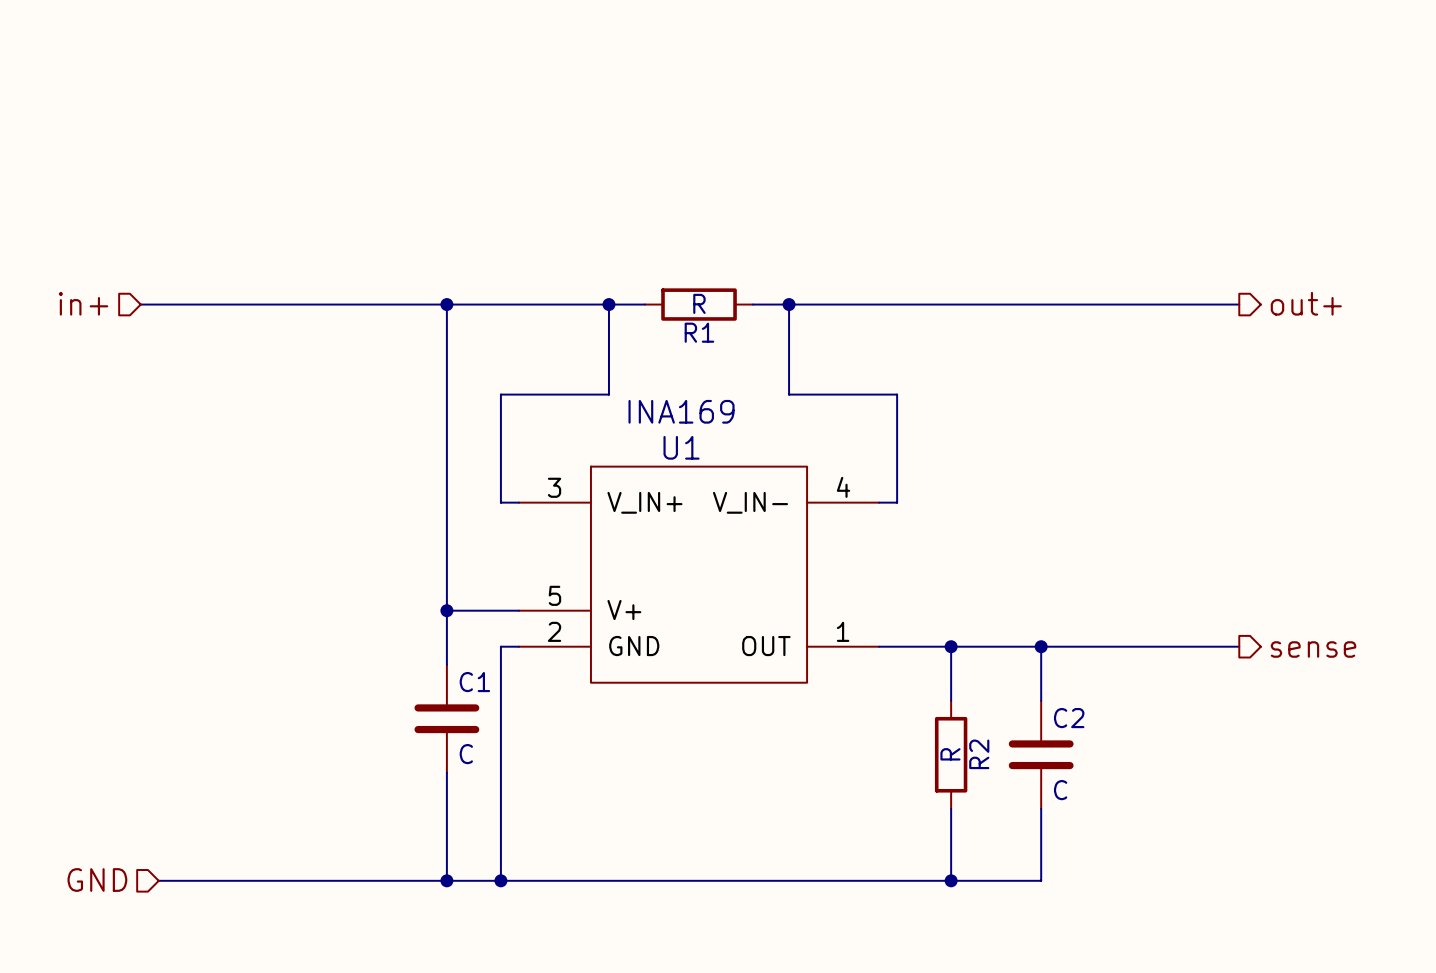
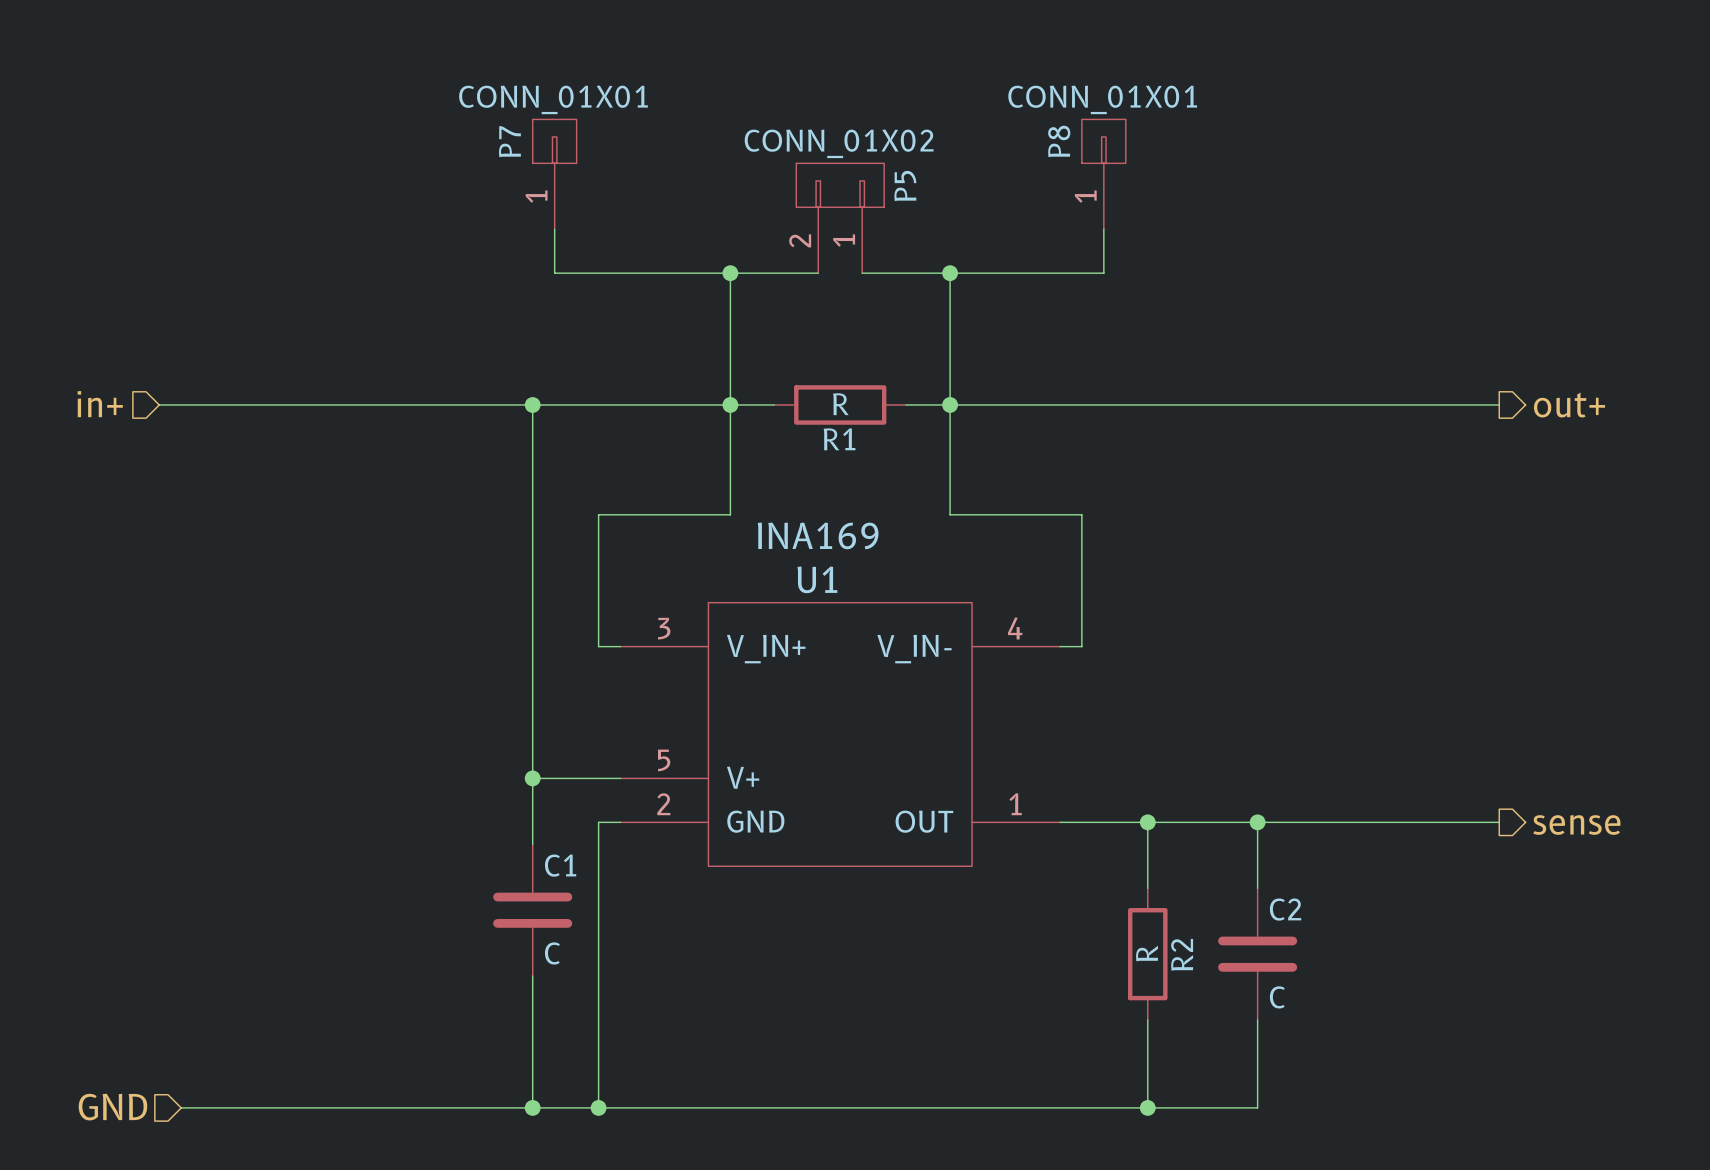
P7: none -> CONN_01X01 (554, 174)
P8: none -> CONN_01X01 (1103, 174)
P5: none -> CONN_01X02 (840, 218)
wire: none -> (554, 229) (554, 273) (818, 273)
wire: none -> (1103, 229) (1103, 273) (862, 273)
wire: none -> (730, 273) (730, 404)
junction: none -> (730, 273)
wire: none -> (950, 273) (950, 404)
junction: none -> (950, 273)

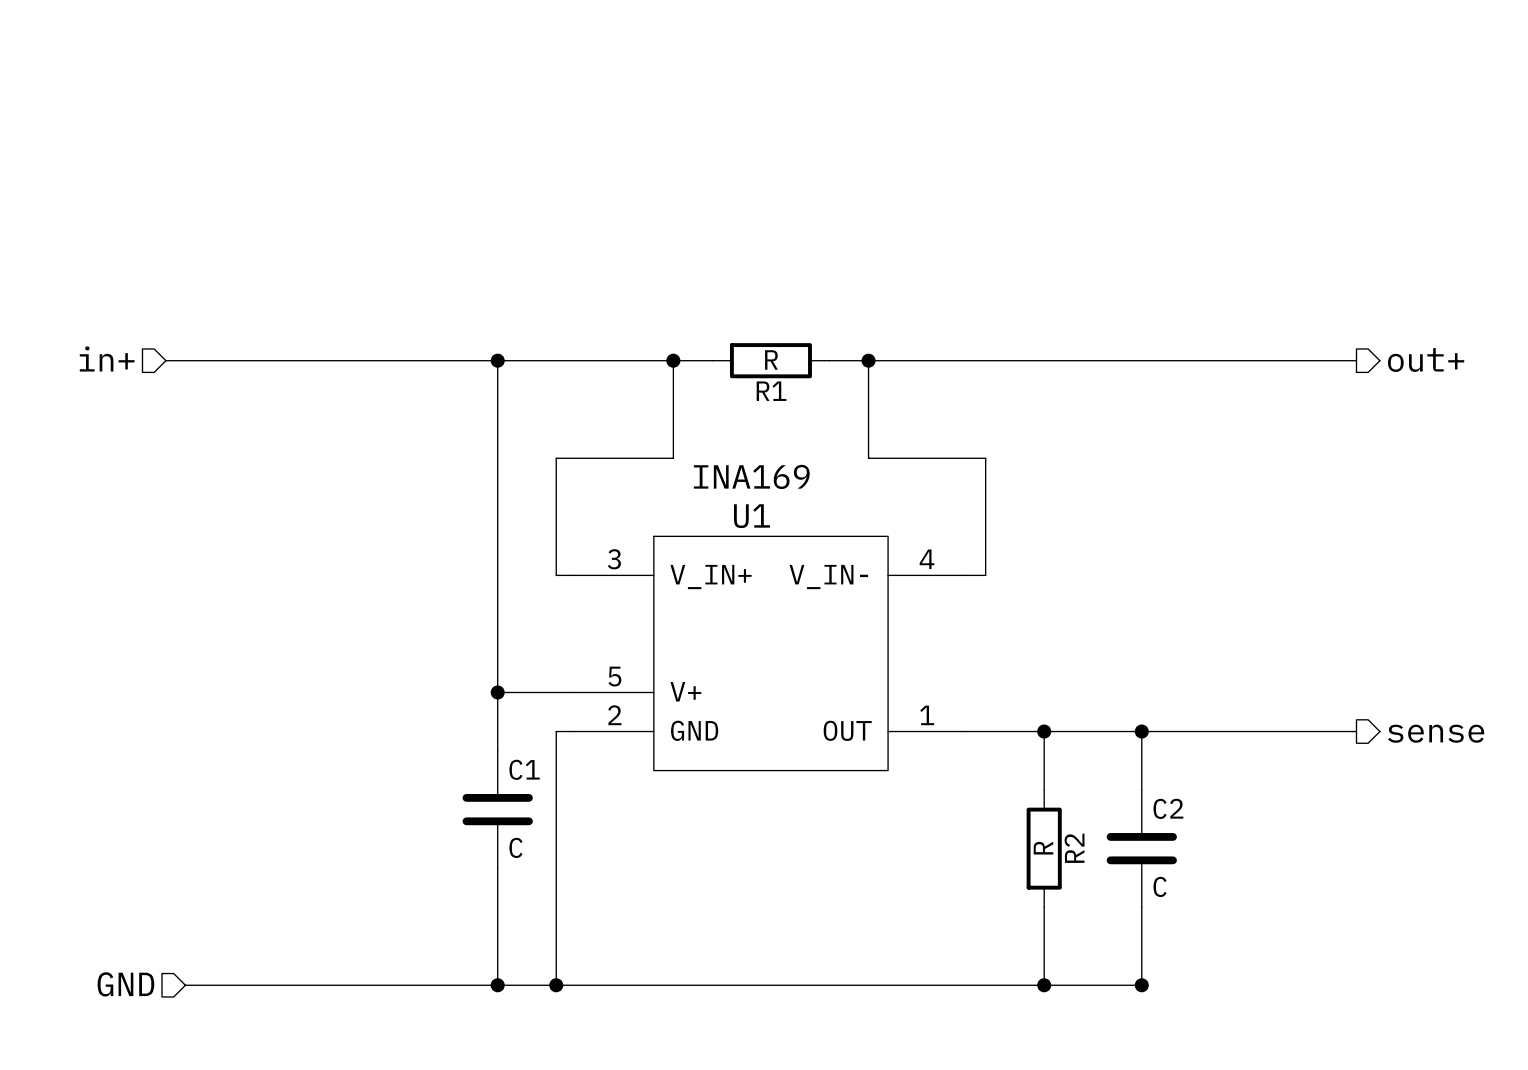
P7: CONN_01X01 (554, 174) -> none
P8: CONN_01X01 (1103, 174) -> none
P5: CONN_01X02 (840, 218) -> none
wire: (554, 229) (554, 273) (818, 273) -> none
wire: (1103, 229) (1103, 273) (862, 273) -> none
wire: (730, 273) (730, 404) -> none
junction: (730, 273) -> none
wire: (950, 273) (950, 404) -> none
junction: (950, 273) -> none
junction: none -> (1141, 985)

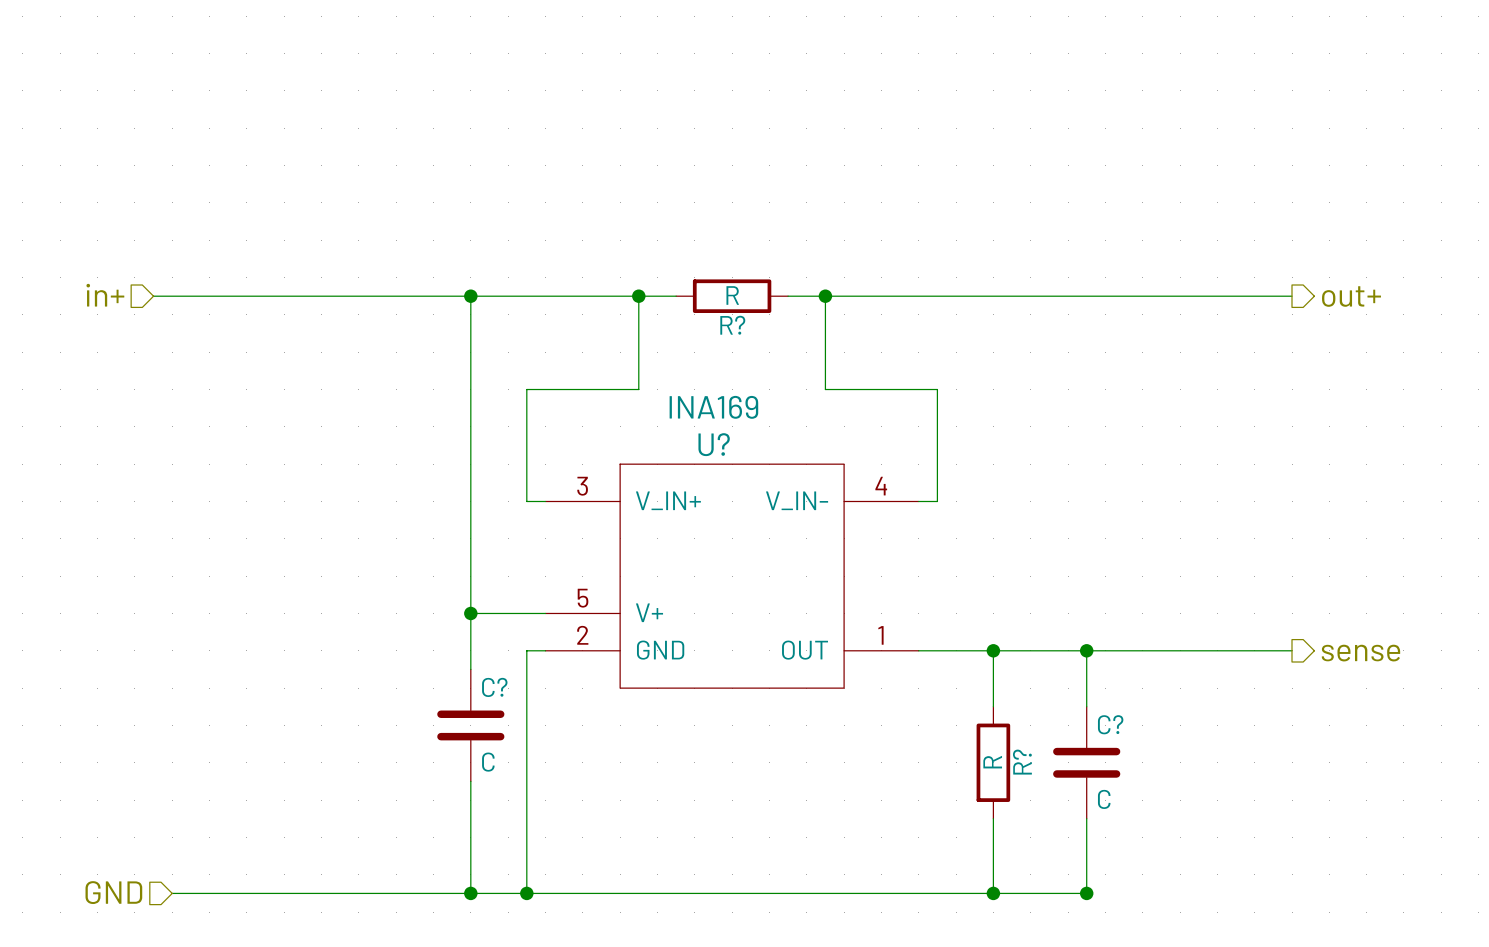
R1 name: R1 (771, 391) -> R? (732, 325)
U1 name: U1 (751, 516) -> U? (714, 444)
C1 name: C1 (524, 769) -> C? (494, 687)
C2 name: C2 (1168, 808) -> C? (1110, 724)
R2 name: R2 (1074, 848) -> R? (1022, 762)

